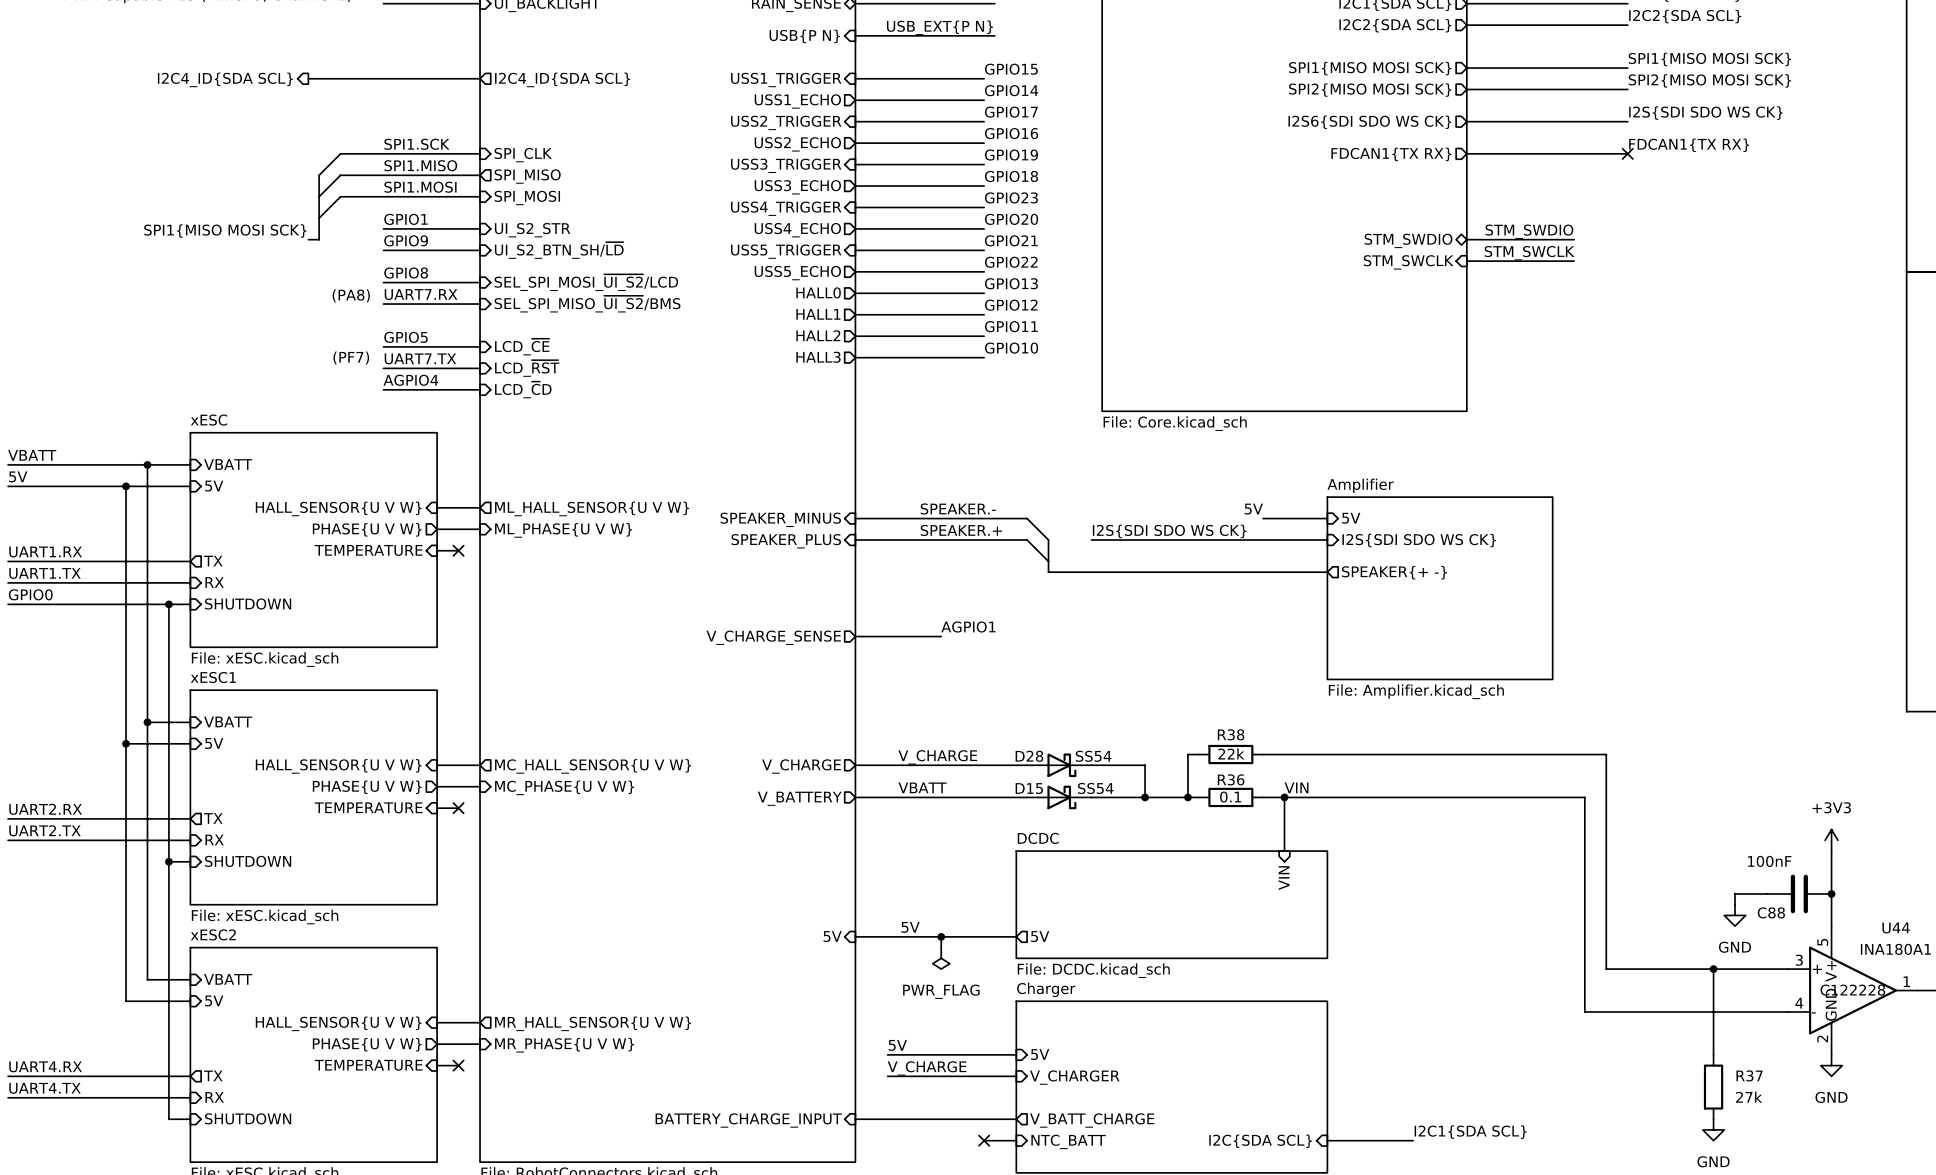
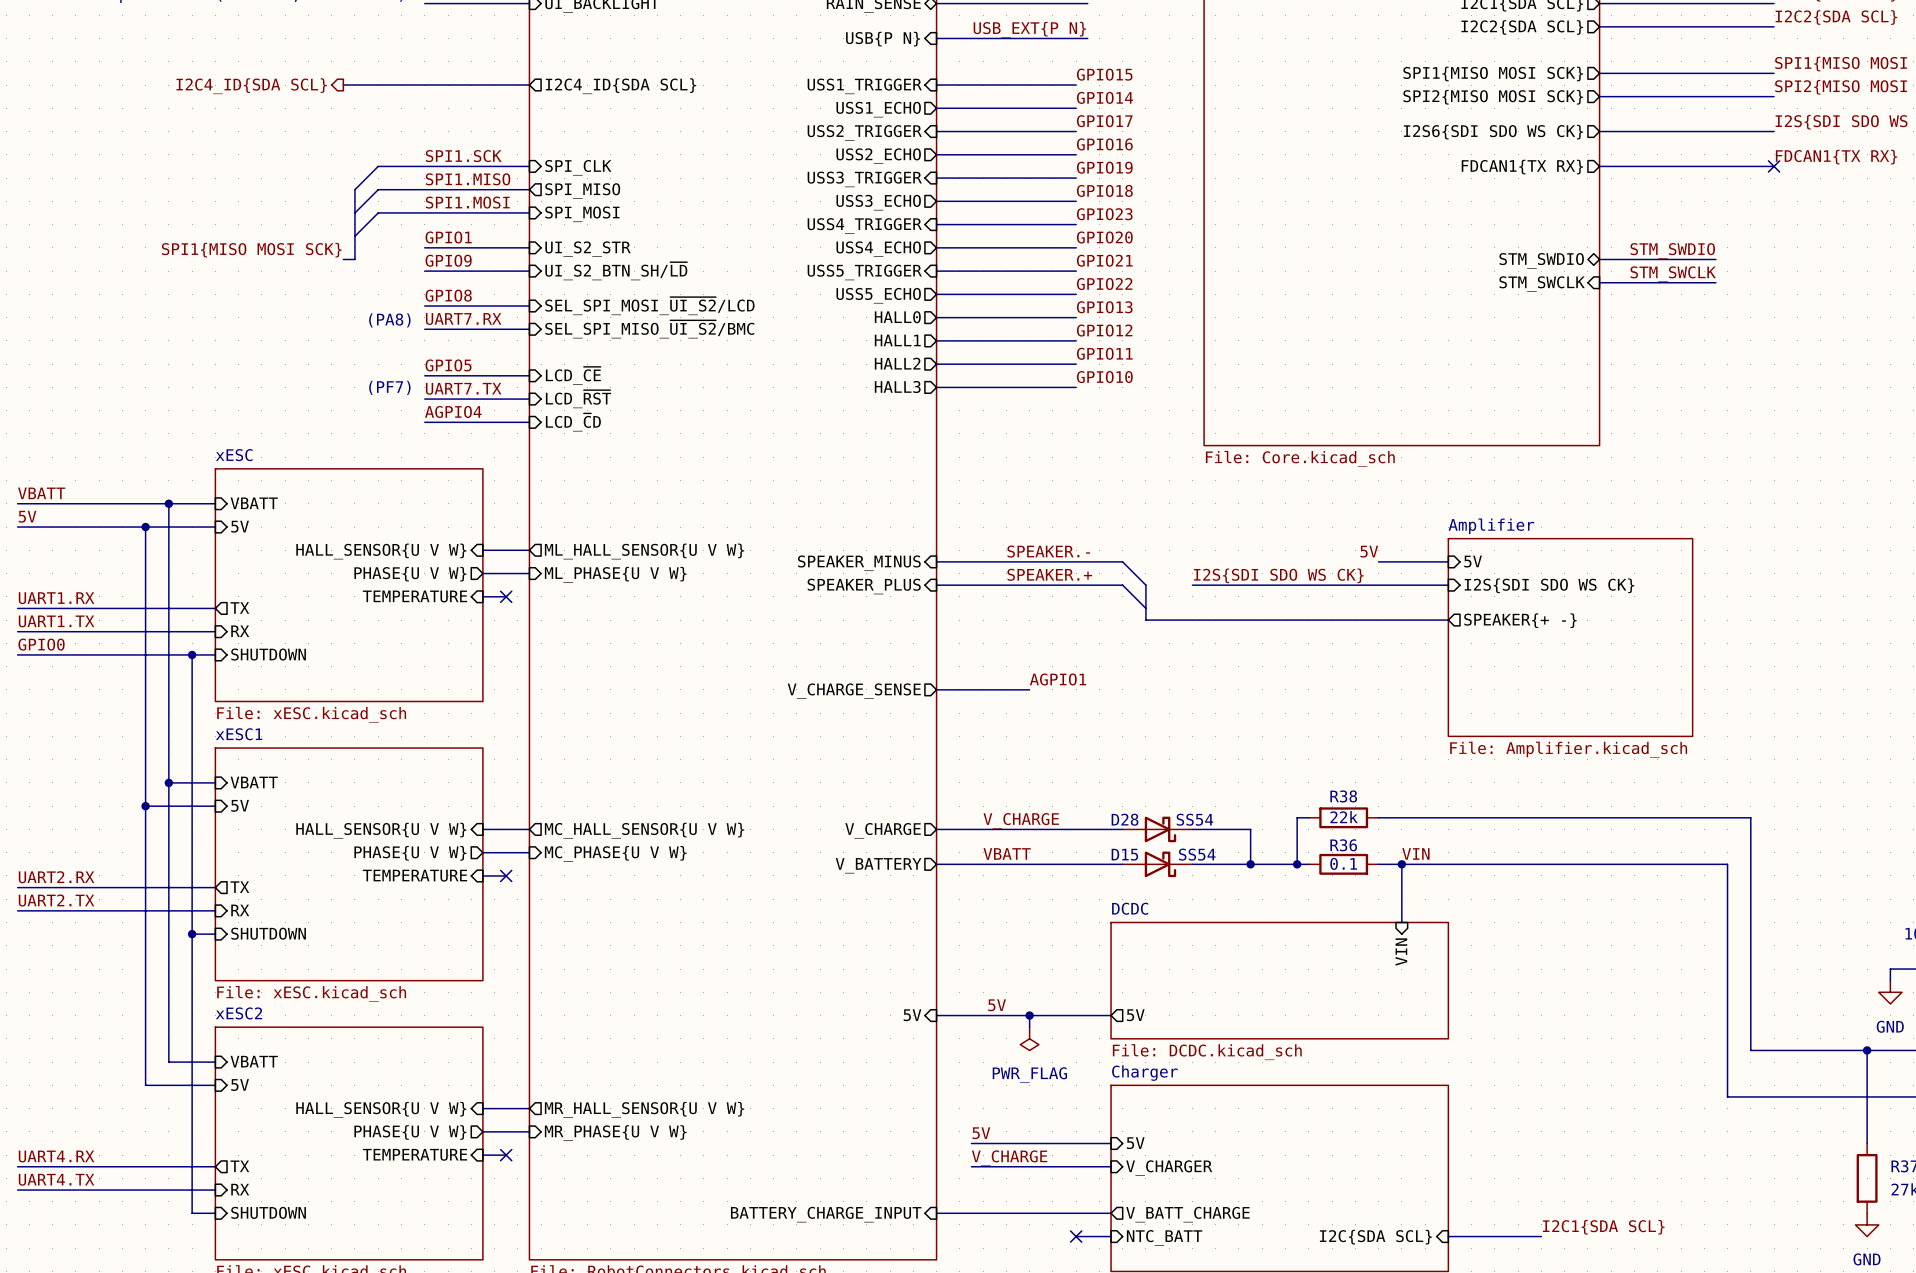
sheet pin: SEL_SPI_MISO_~{UI_S2}/BMS (587, 304) -> SEL_SPI_MISO_~{UI_S2}/BMC (649, 329)

